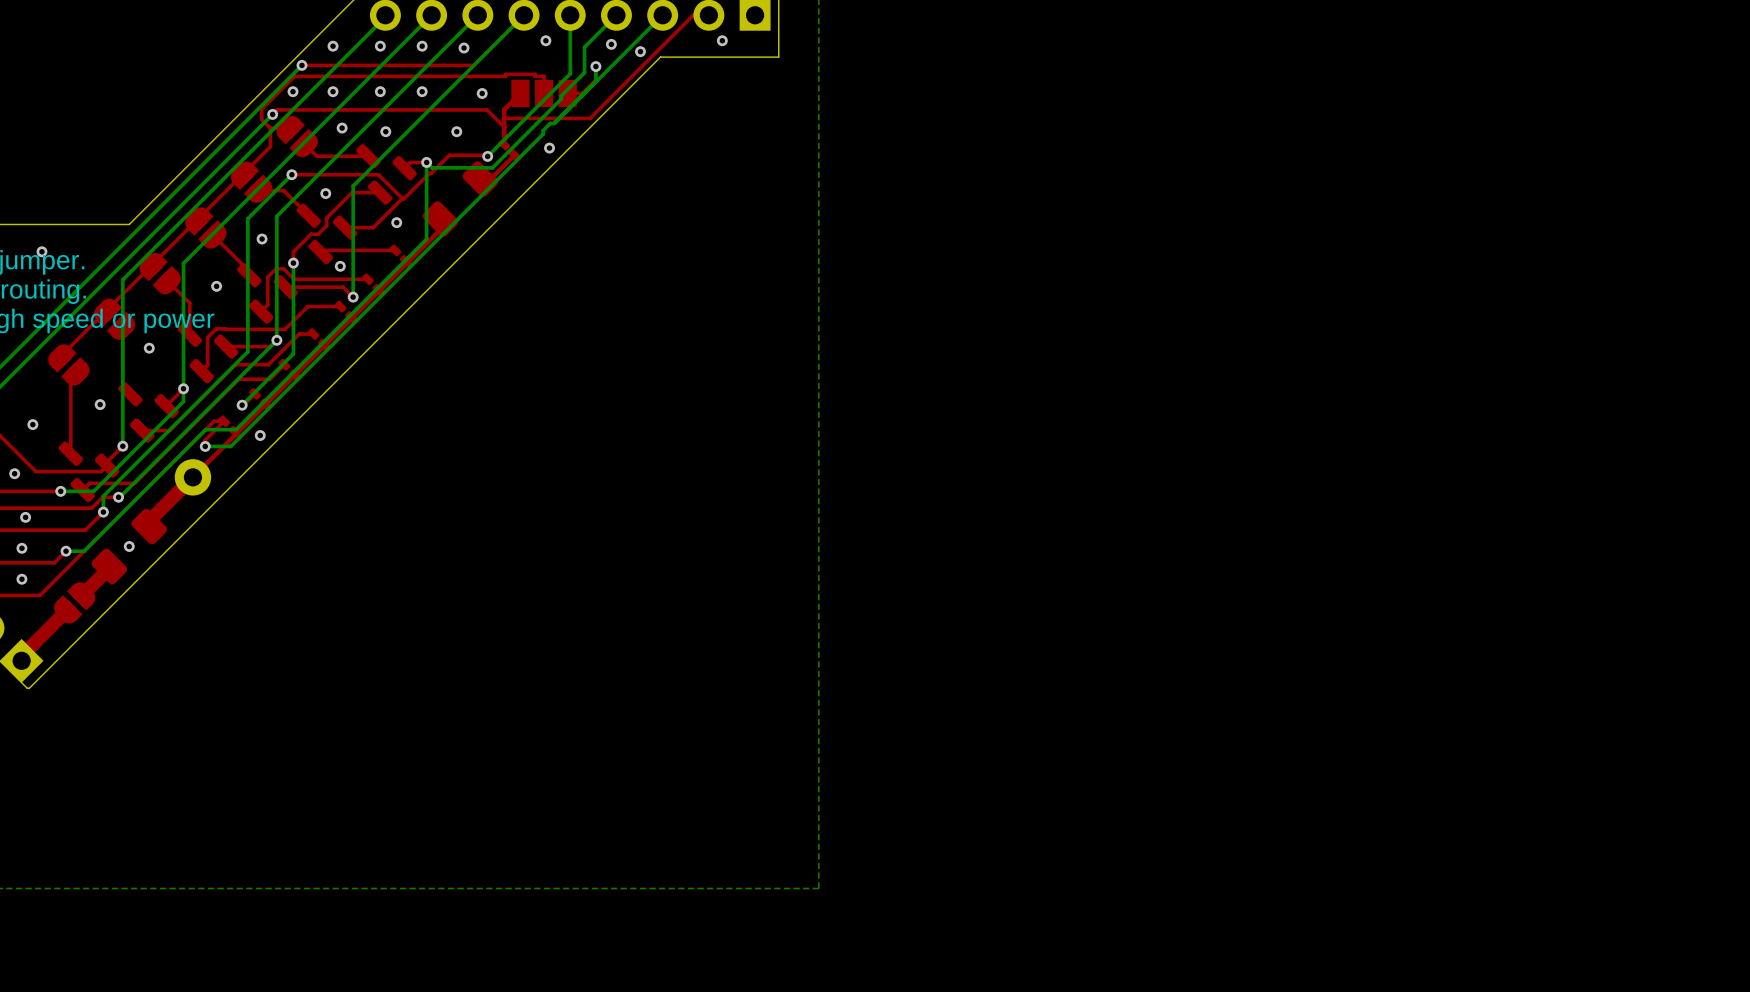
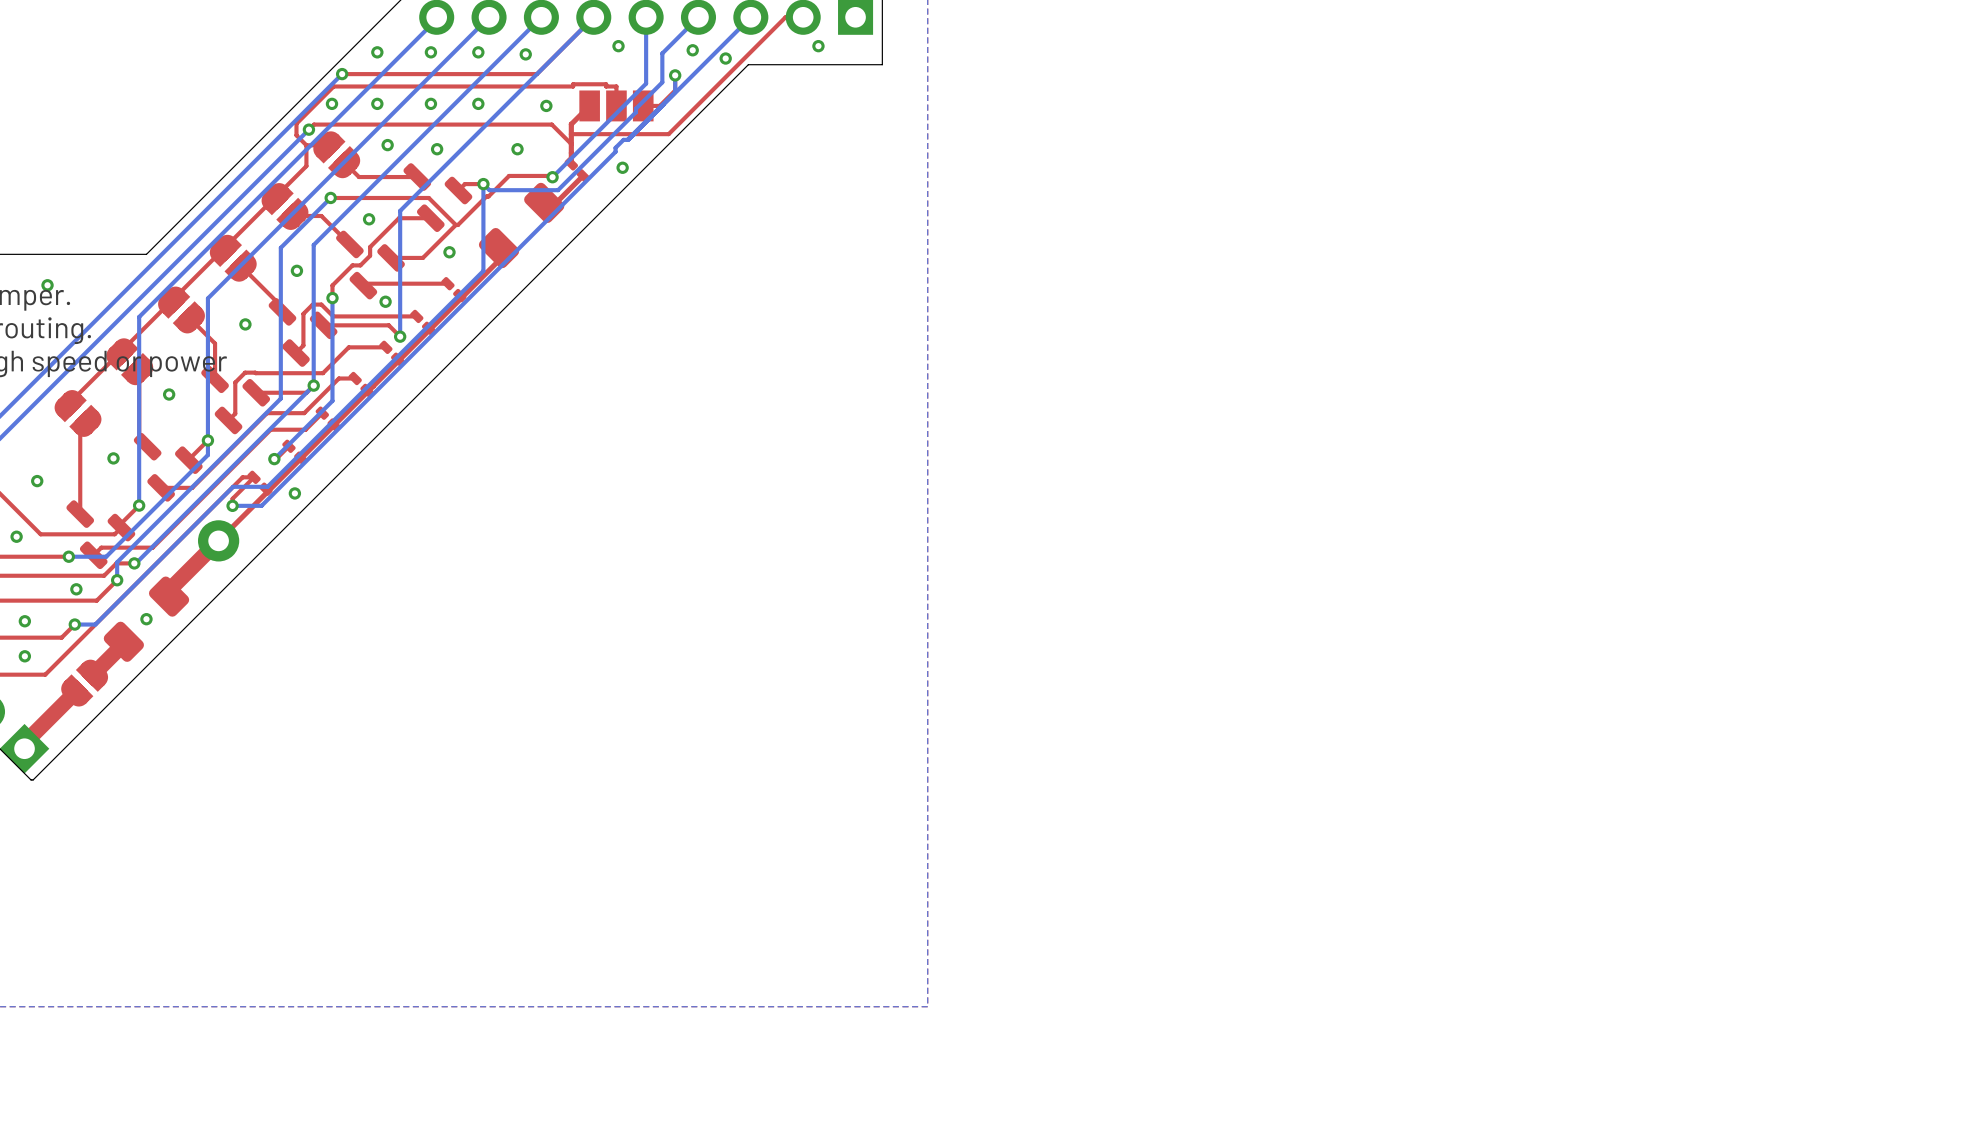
via position: (25, 517) -> (76, 589)

